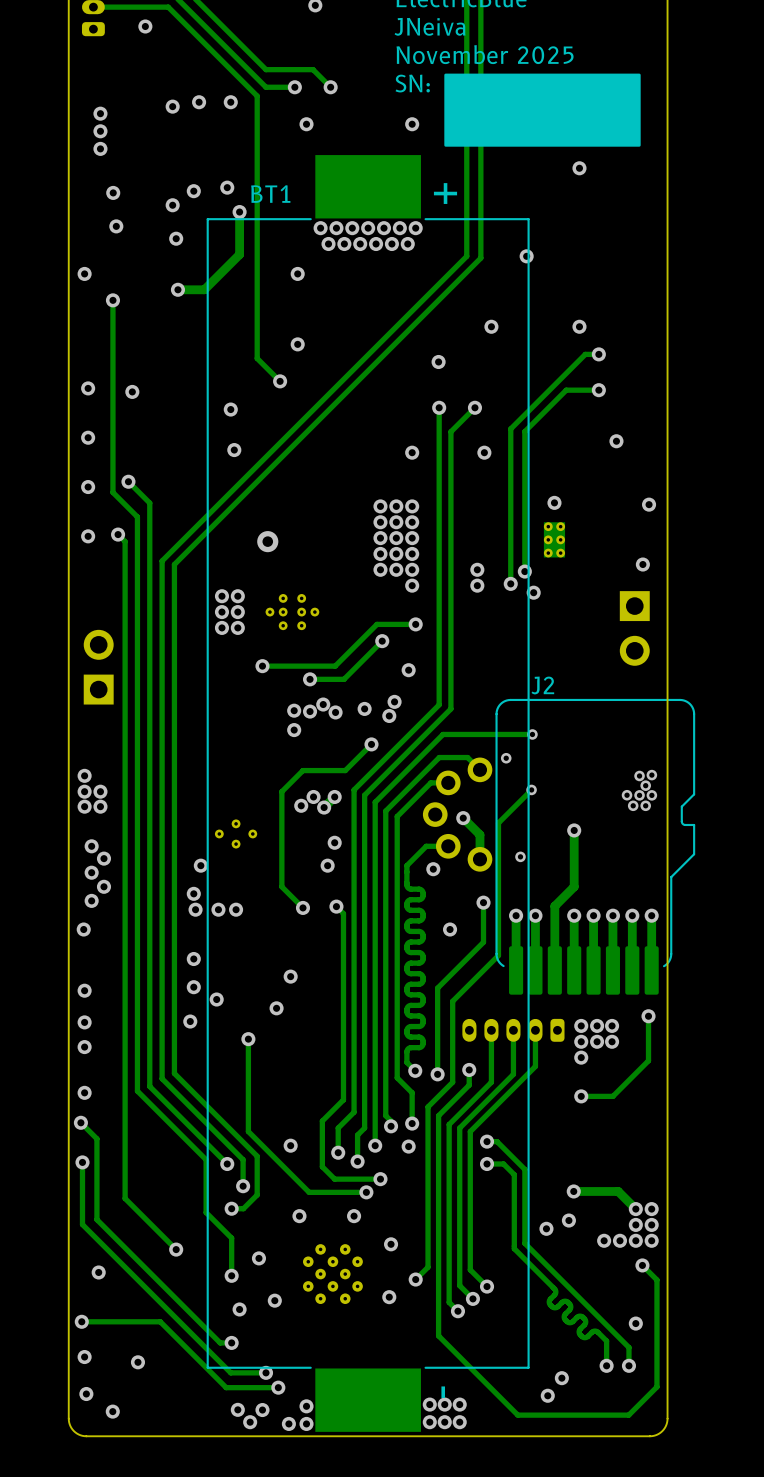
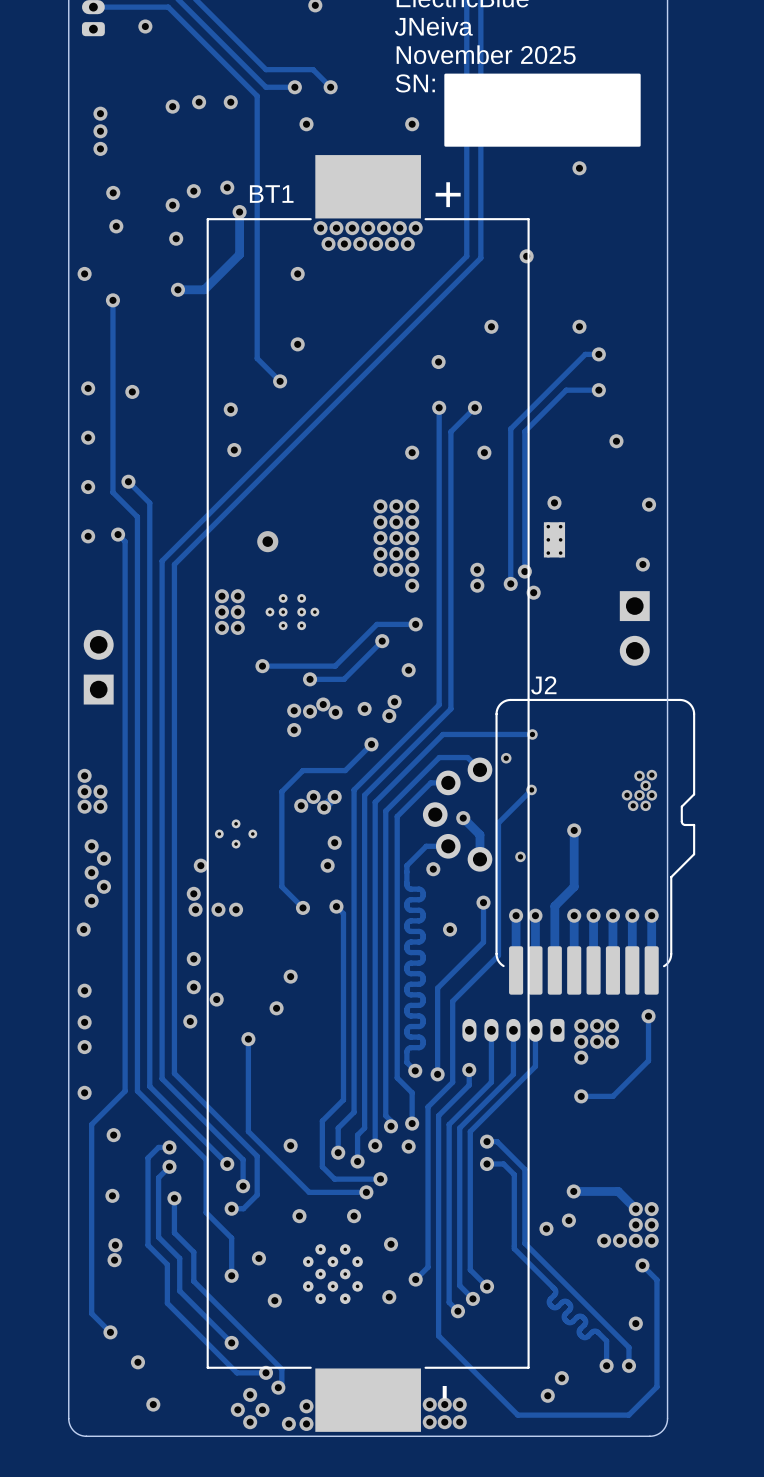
track: (125, 1091) (125, 1198) (176, 1249) -> (125, 1091) (91, 1124) (91, 1313) (110, 1332)
track: (80, 1122) (96, 1138) (96, 1219) (220, 1342) (231, 1342) -> (169, 1166) (158, 1177) (158, 1237) (179, 1258) (179, 1290) (231, 1342)
via: (80, 1122) -> none
via: none -> (113, 1135)
via: none -> (169, 1147)
track: (82, 1162) (82, 1224) (230, 1372) (236, 1372) -> (169, 1147) (158, 1147) (148, 1158) (148, 1245) (167, 1264) (167, 1303) (236, 1372)
via: (82, 1162) -> none
via: none -> (169, 1166)
via: none -> (112, 1195)
track: none -> (174, 1198) (174, 1232) (193, 1252) (193, 1281) (281, 1369) (281, 1387)
via: none -> (174, 1198)
via: none -> (115, 1245)
via: (176, 1249) -> none
via: none -> (114, 1260)
via: (98, 1272) -> none
via: (239, 1309) -> none
track: (81, 1321) (160, 1321) (226, 1387) (278, 1387) -> none
via: (81, 1321) -> none
via: none -> (110, 1332)
via: (84, 1357) -> none
via: (86, 1394) -> none
via: none -> (250, 1394)
via: none -> (153, 1404)
via: (112, 1411) -> none

